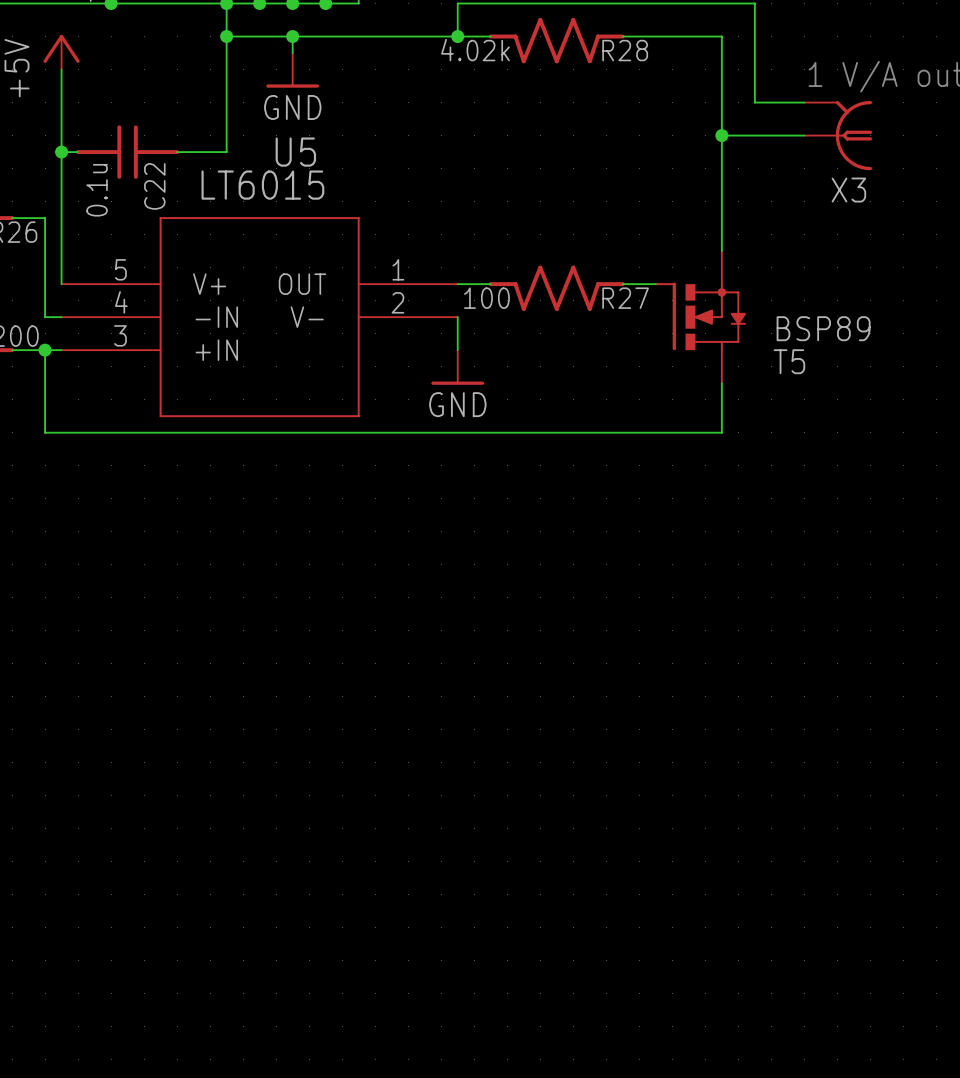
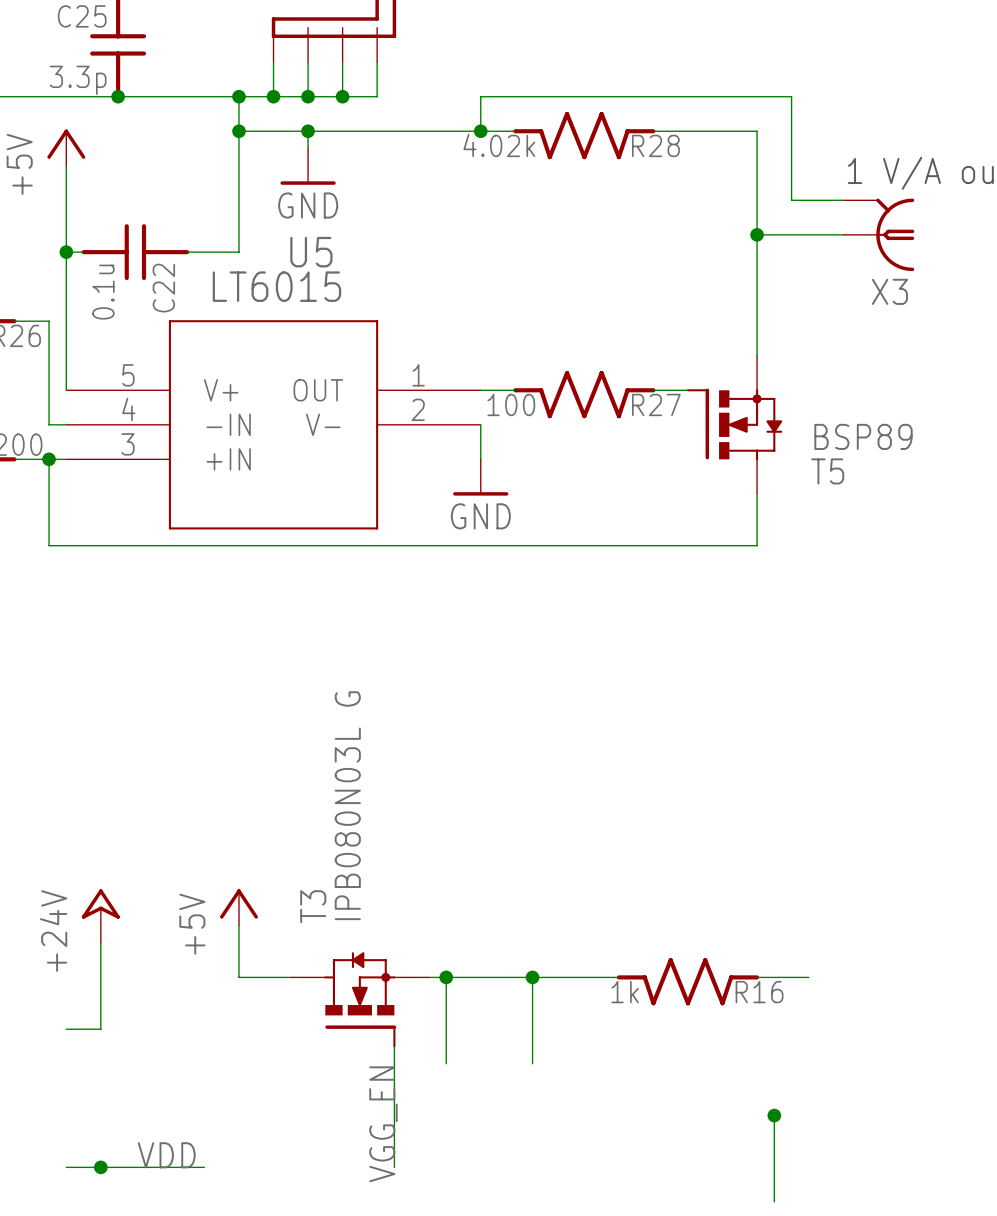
power symbol: none -> +5V (238, 907)
power symbol: none -> +24V (100, 916)
wire: none -> (238, 925) (238, 977) (290, 977)
wire: none -> (100, 942) (100, 1029) (66, 1029)
wire: none -> (428, 977) (618, 977)
wire: none -> (446, 977) (446, 1063)
junction: none -> (446, 977)
wire: none -> (532, 977) (532, 1063)
junction: none -> (532, 977)
wire: none -> (757, 977) (808, 977)
R16: none -> 1k (687, 981)
T3: none -> IPB080N03L G (359, 999)
wire: none -> (394, 1046) (394, 1167)
wire: none -> (774, 1115) (774, 1201)
junction: none -> (774, 1115)
label: none -> VGG_EN (383, 1124)
label: none -> VDD (166, 1155)
wire: none -> (66, 1167) (204, 1167)
junction: none -> (100, 1167)

